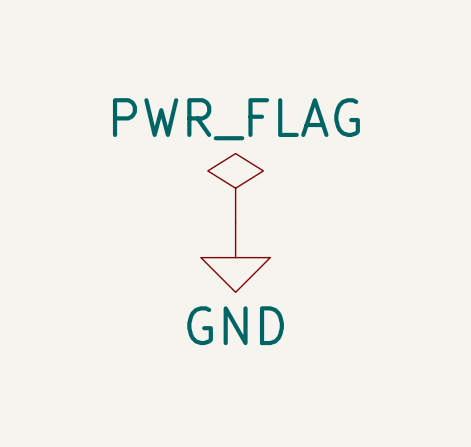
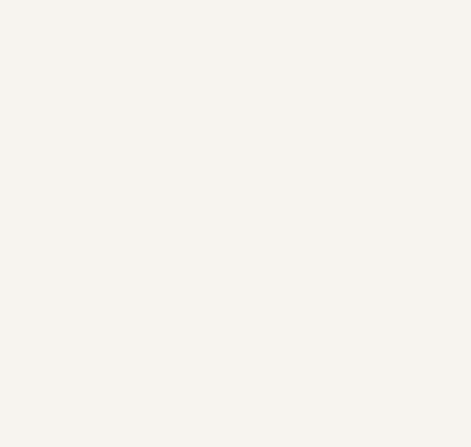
power symbol: PWR_FLAG (235, 188) -> none
power symbol: GND (235, 257) -> none

